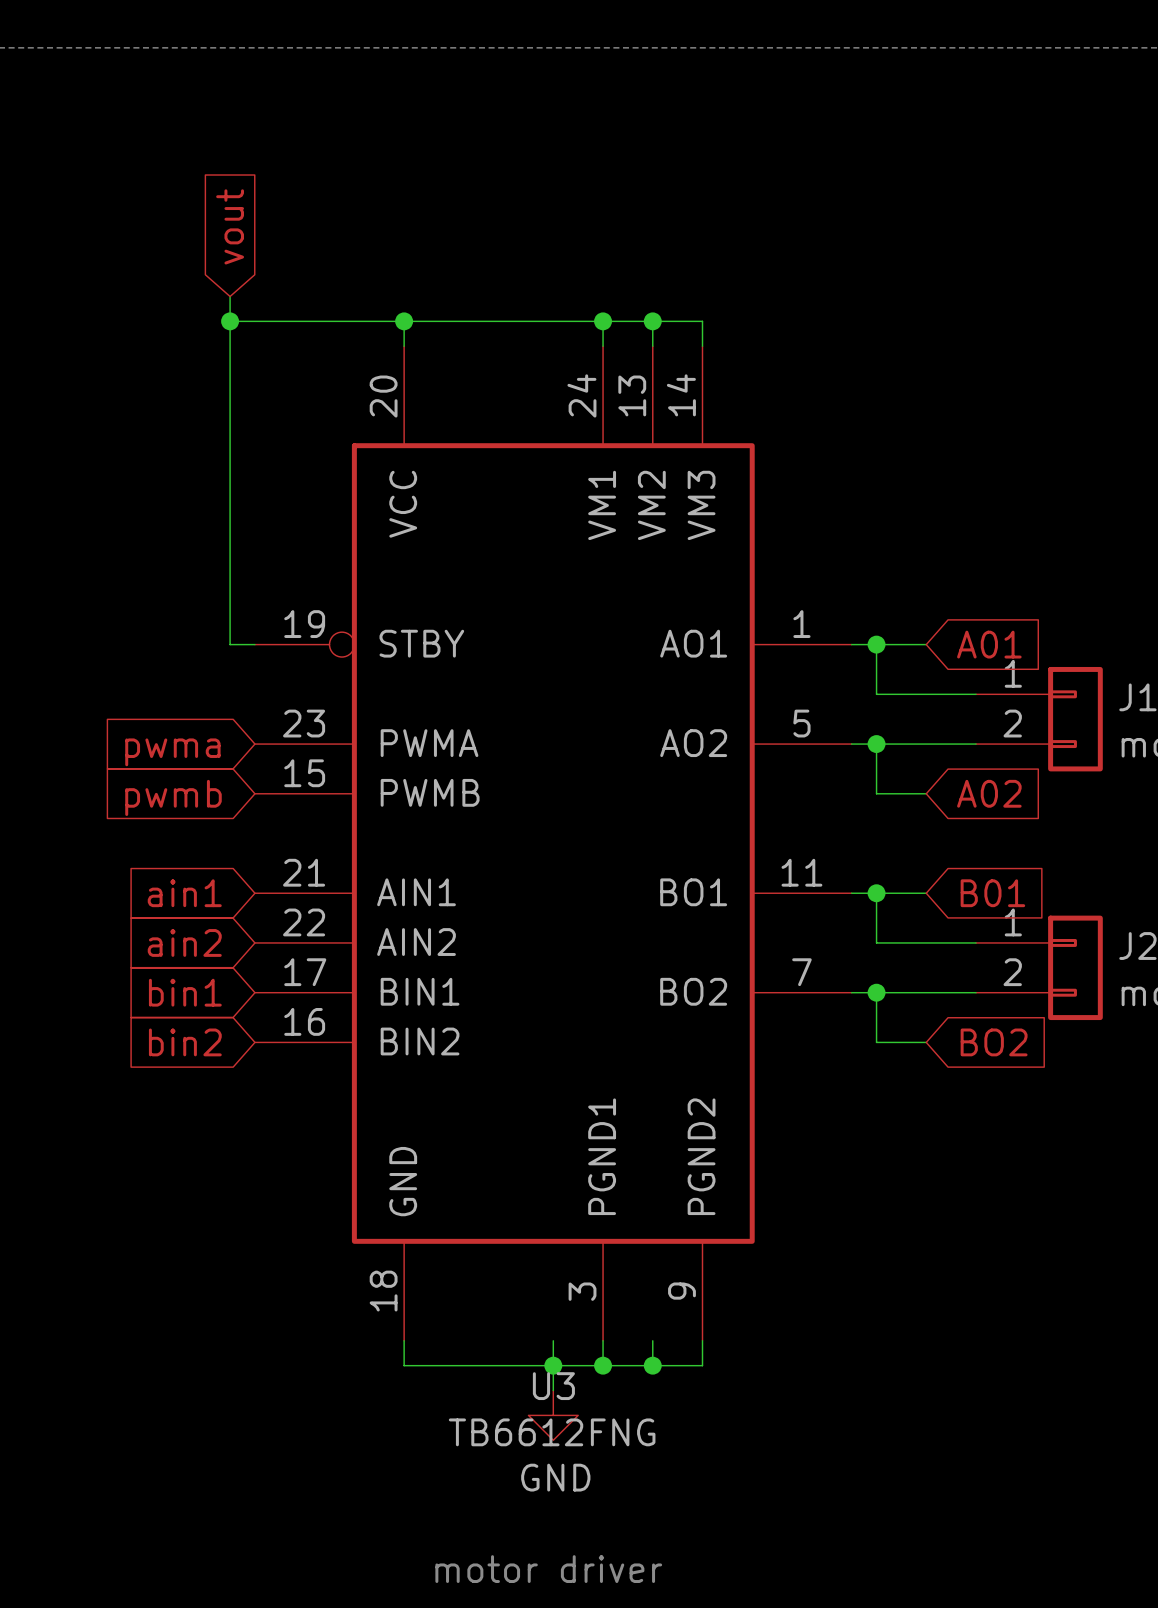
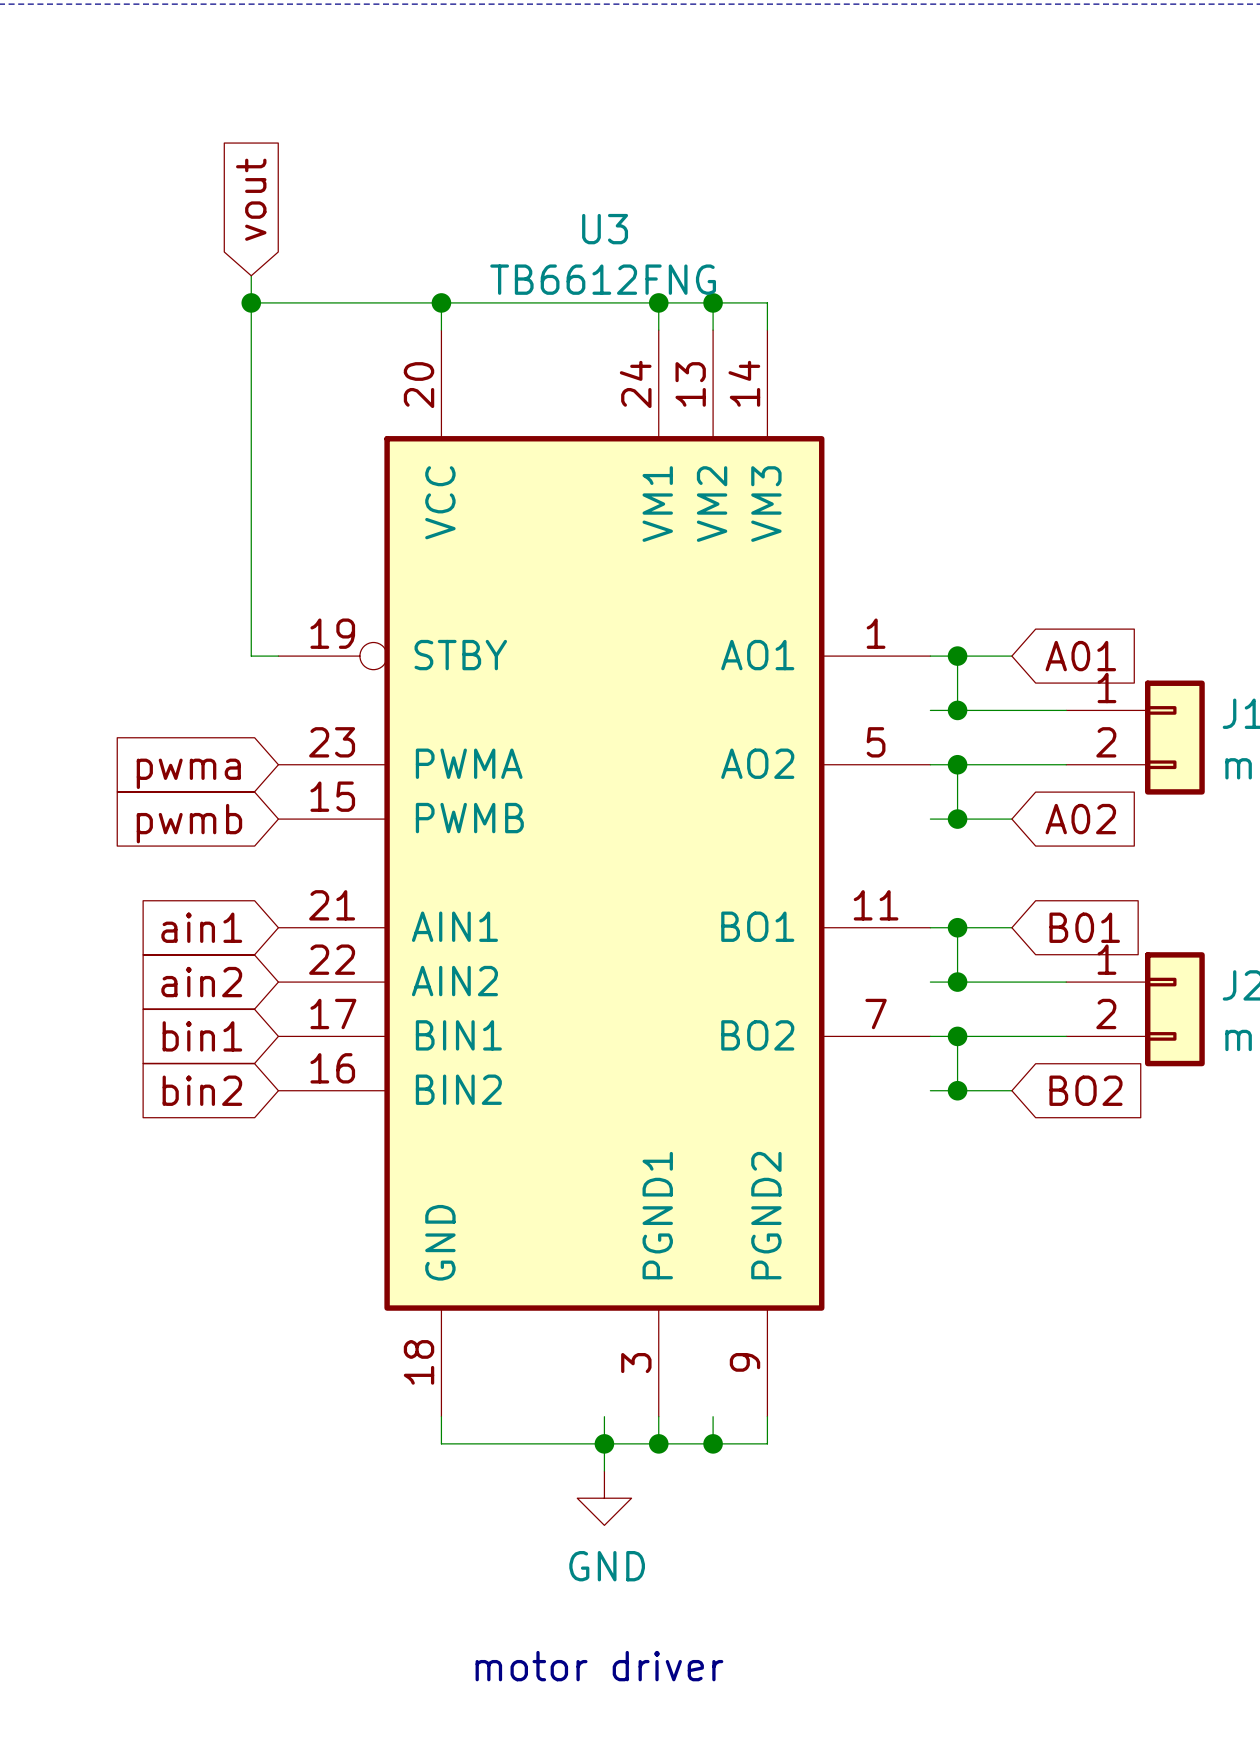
wire: none -> (930, 710) (957, 710)
junction: none -> (957, 710)
wire: none -> (930, 819) (957, 819)
junction: none -> (957, 819)
wire: none -> (930, 982) (957, 982)
junction: none -> (957, 982)
wire: none -> (930, 1090) (957, 1090)
junction: none -> (957, 1090)
U3 name position: U3 (553, 1386) -> U3 (605, 229)
U3 value position: TB6612FNG (552, 1432) -> TB6612FNG (603, 279)

